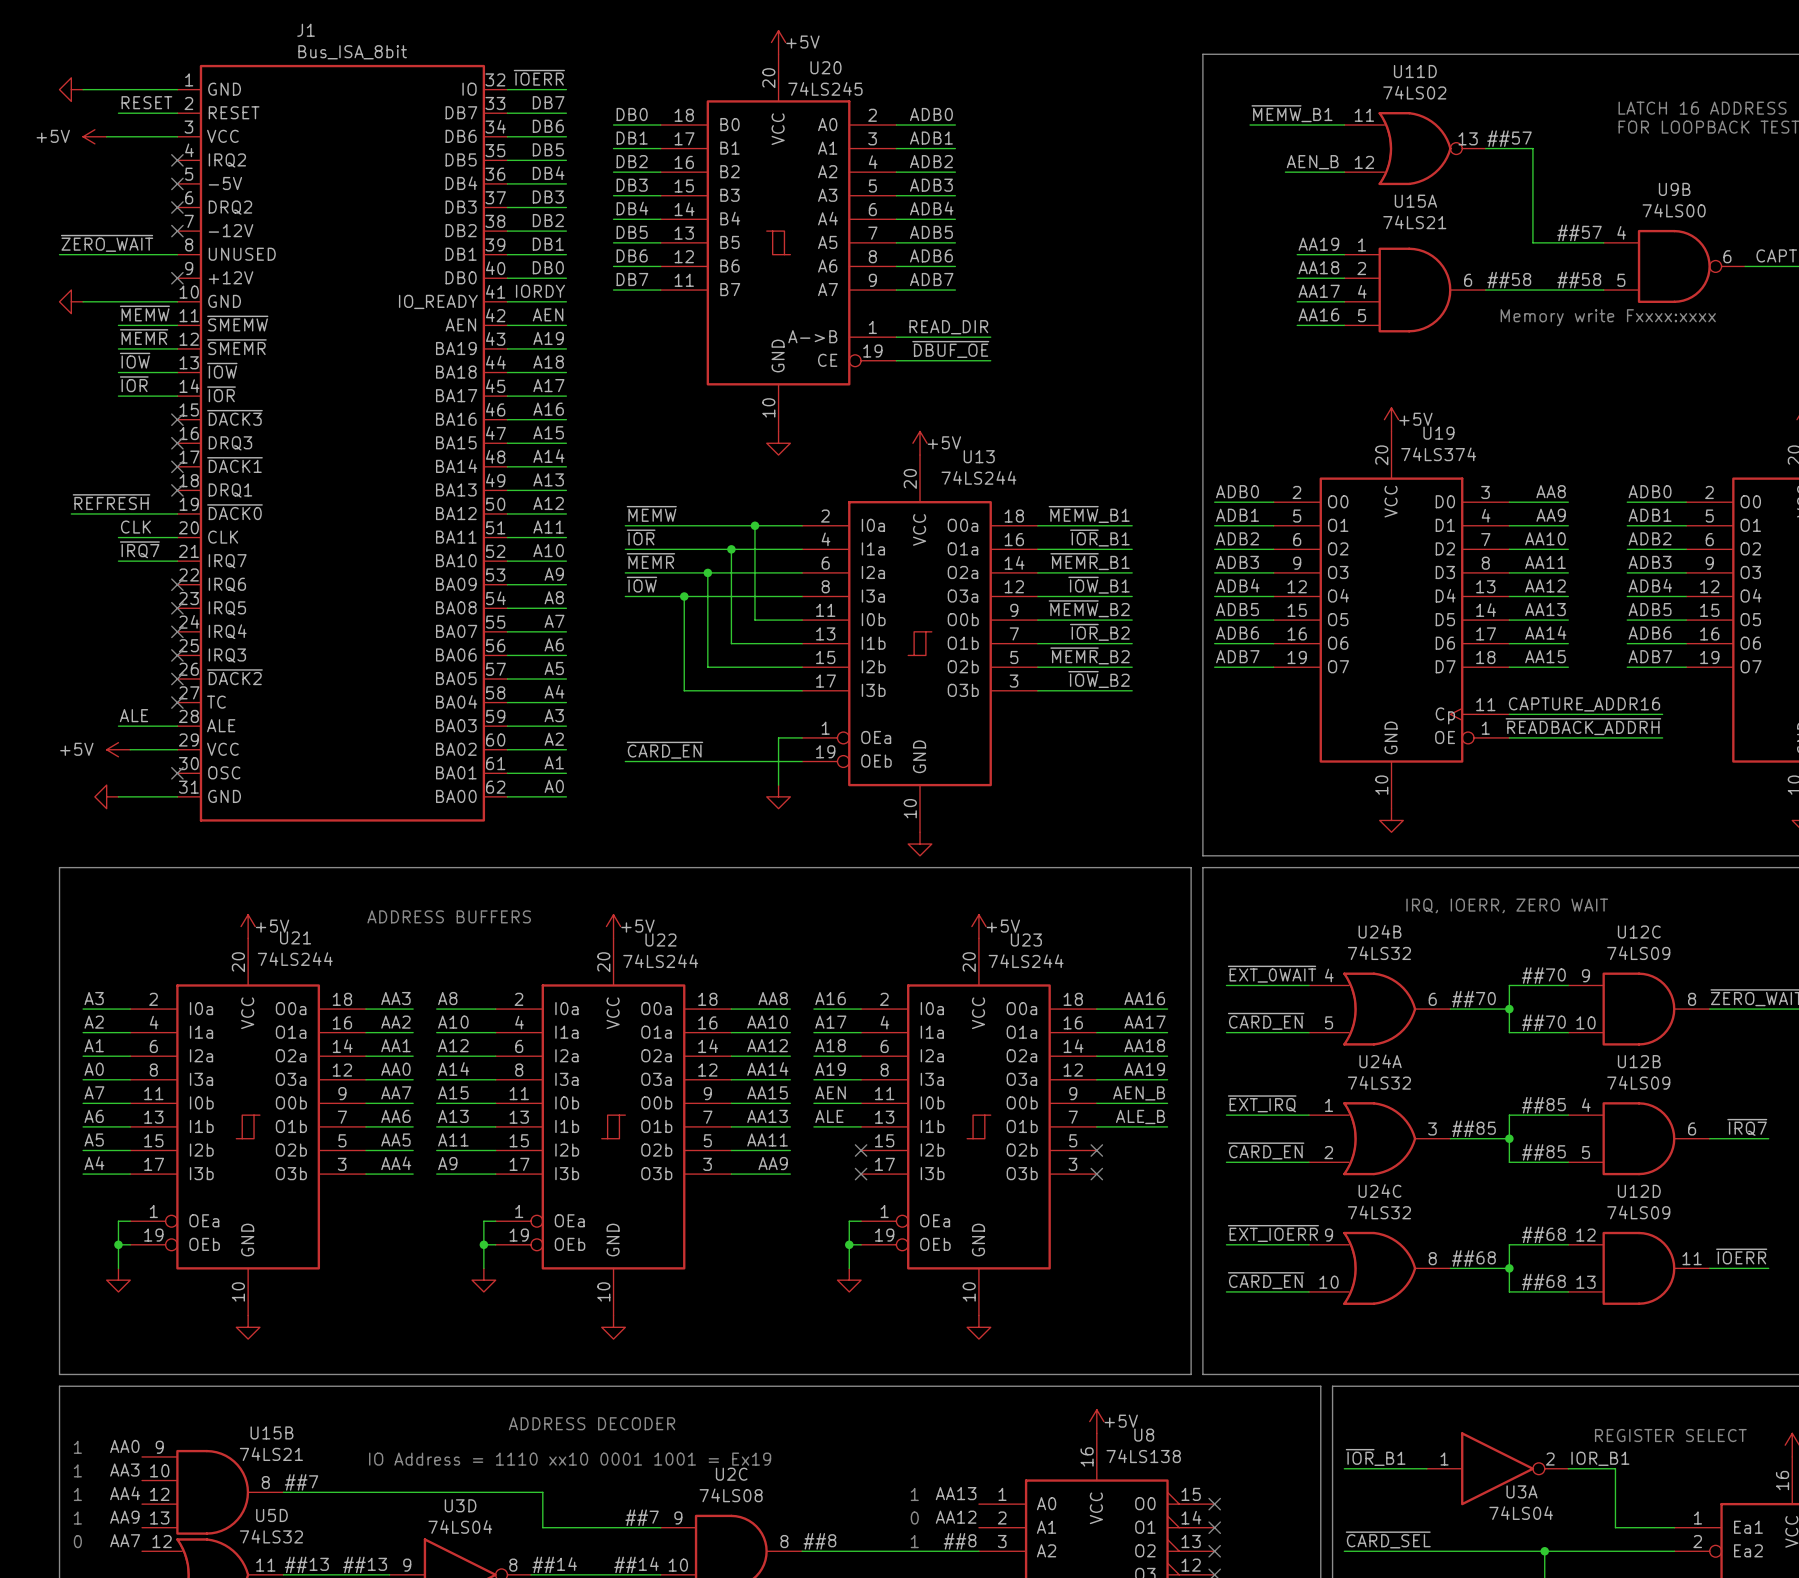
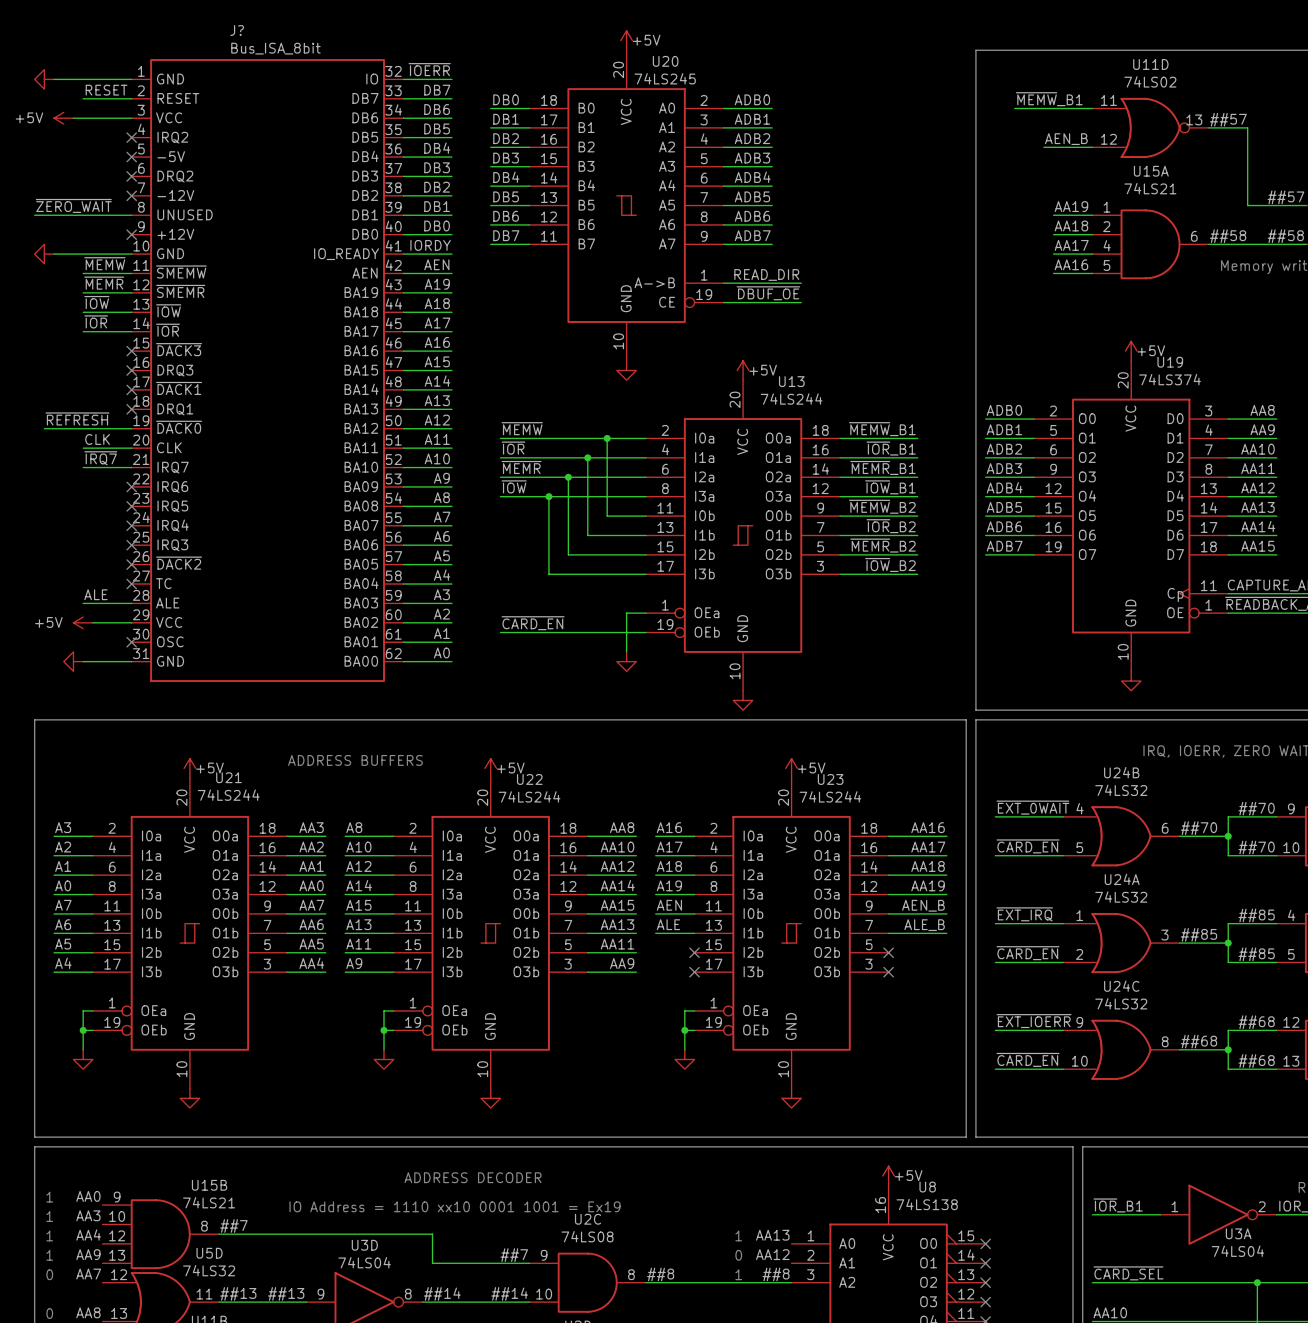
J1 name: J1 (306, 30) -> J? (237, 30)

